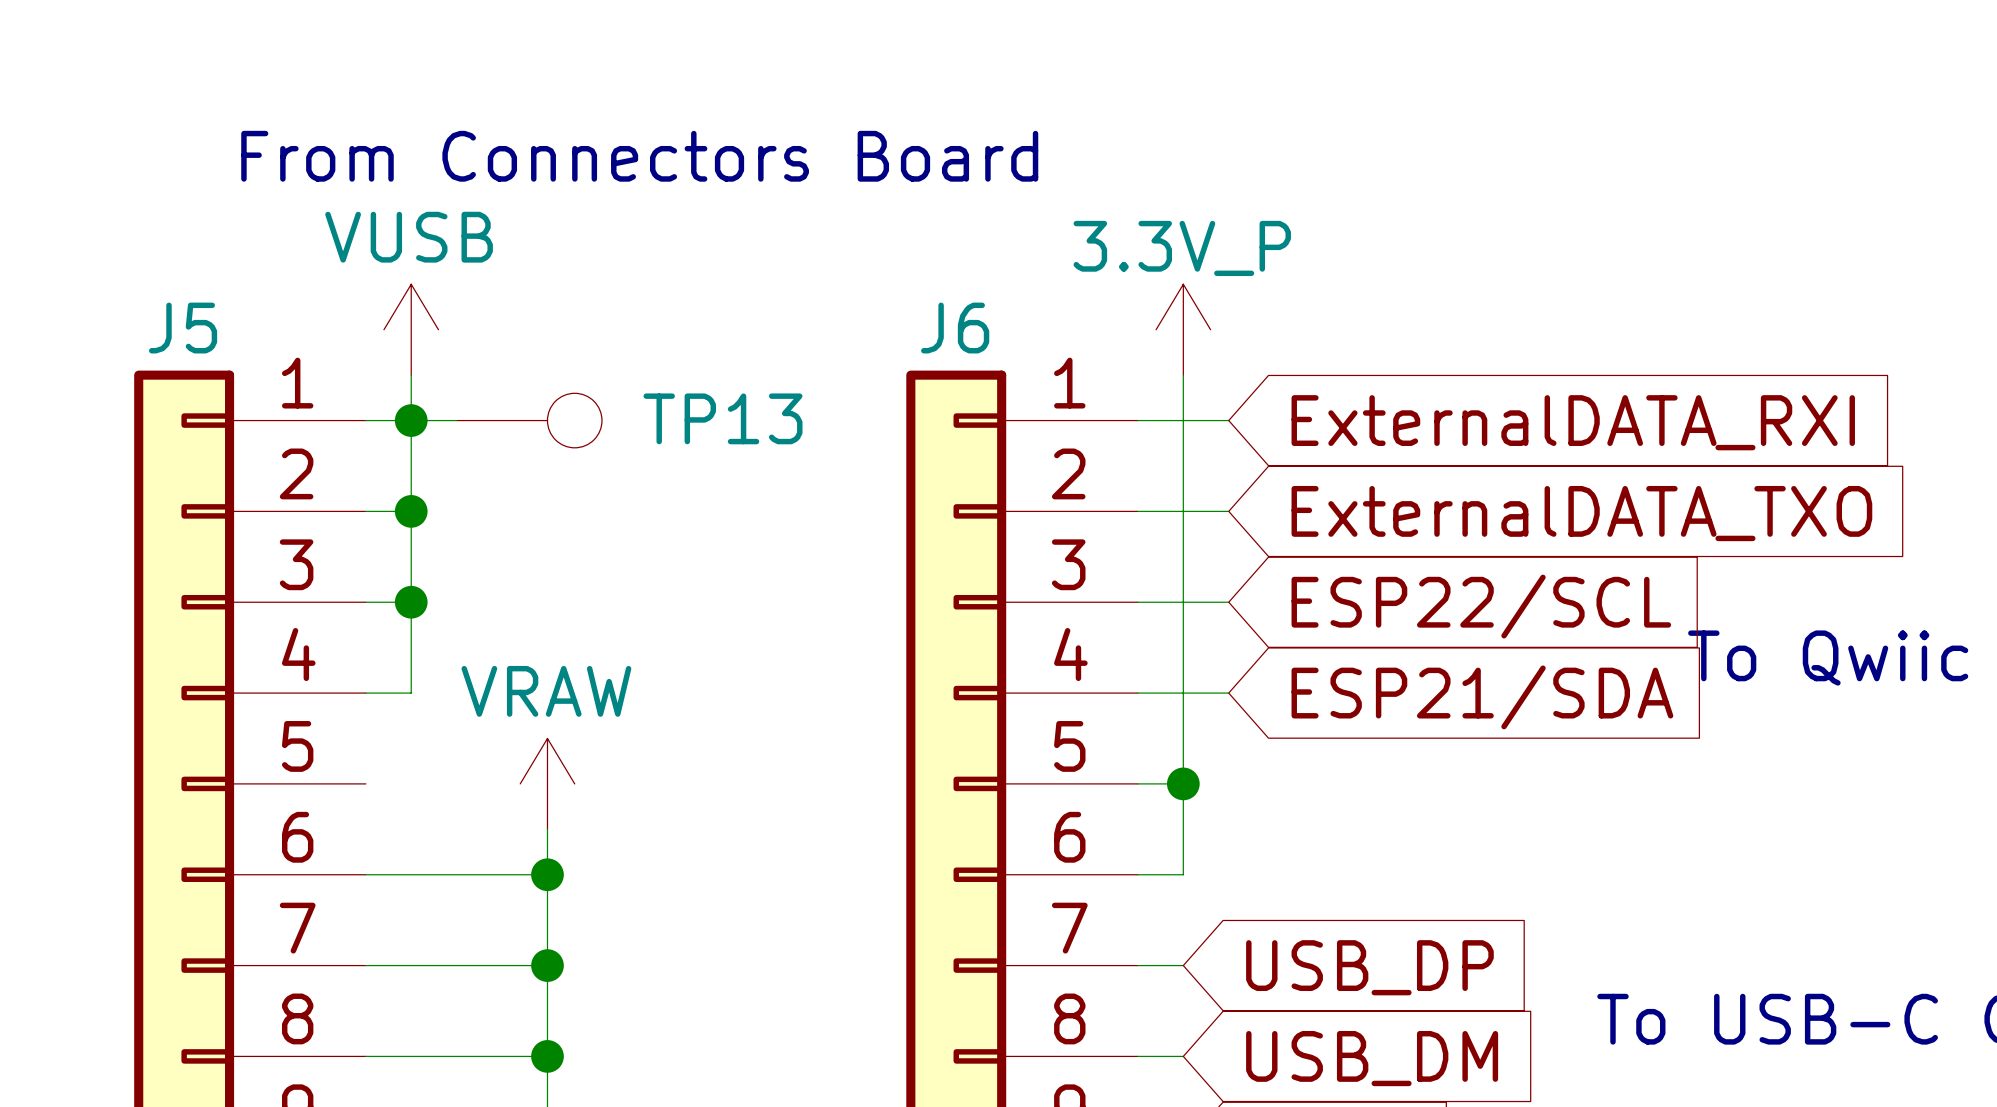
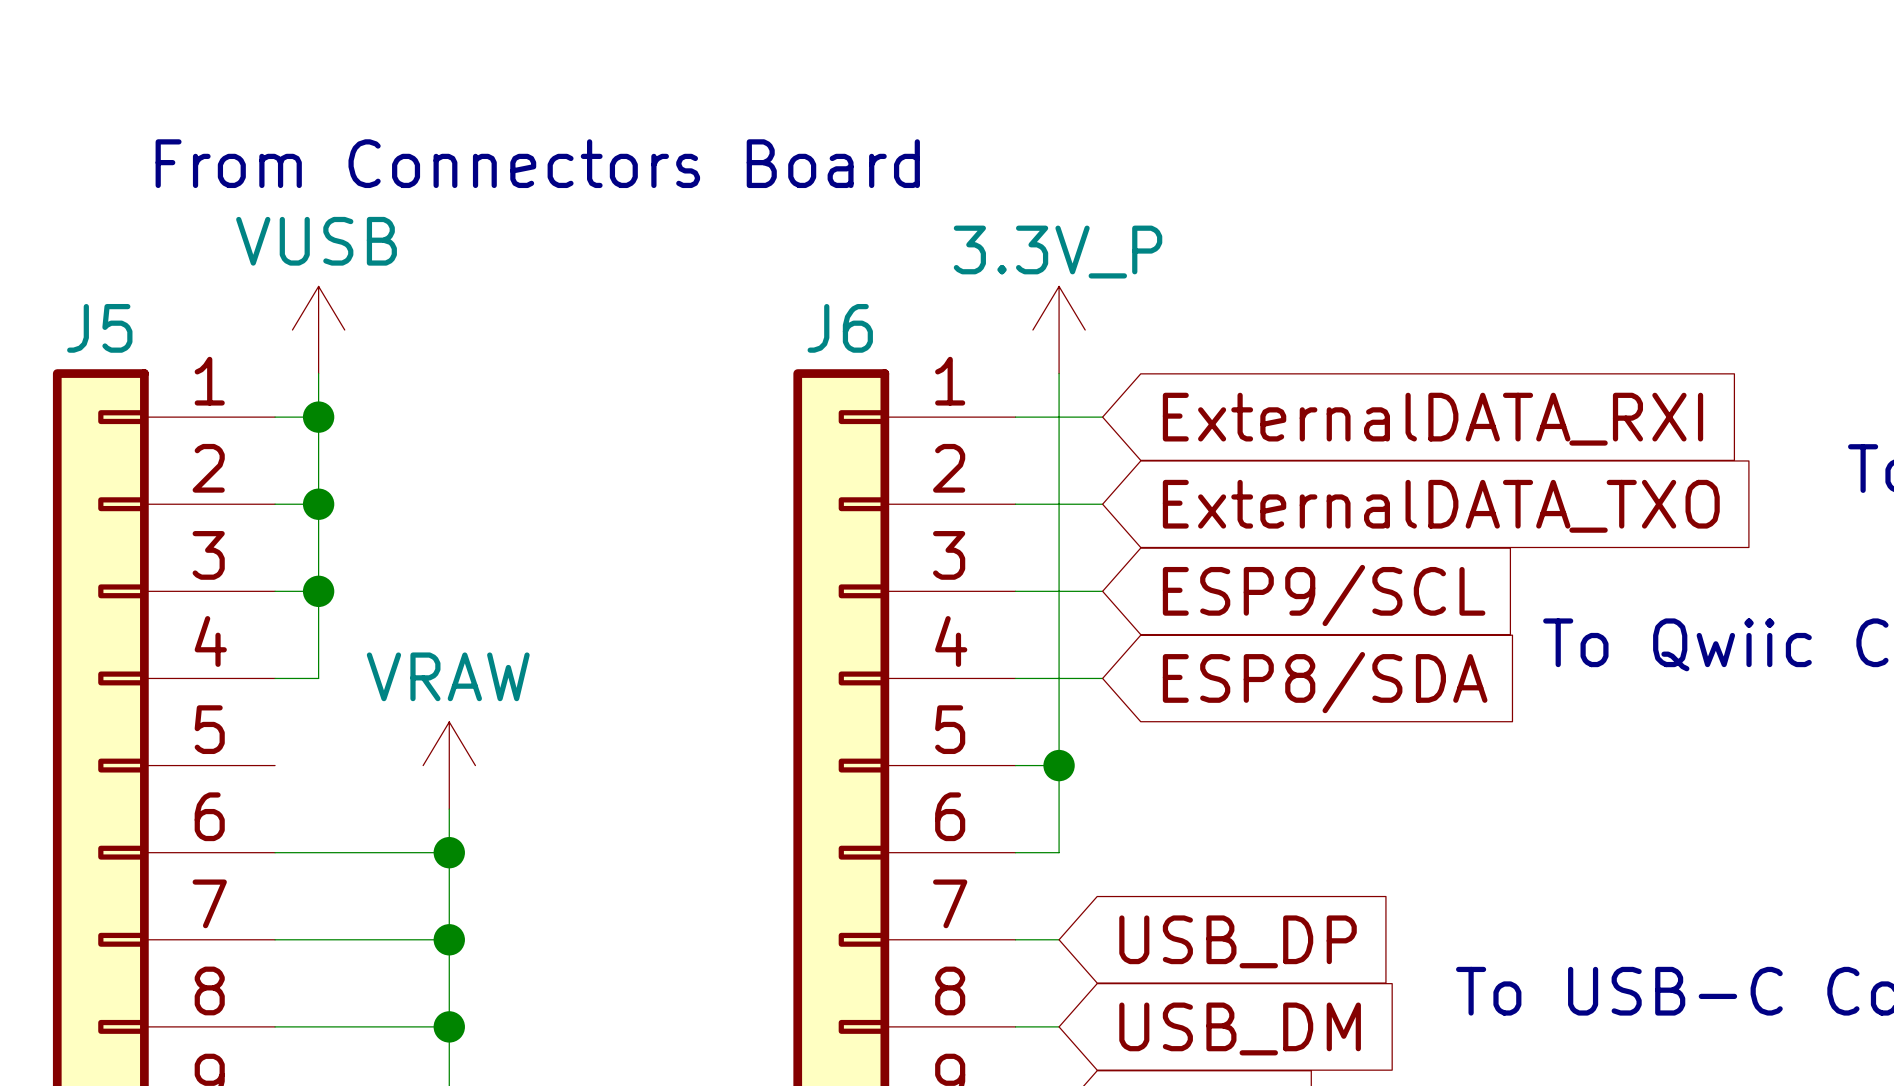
wire: (411, 420) (456, 420) -> none
TP13: (529, 420) -> none
global label: ESP22/SCL (1481, 606) -> ESP9/SCL (1324, 595)
global label: ESP21/SDA (1482, 697) -> ESP8/SDA (1325, 682)

